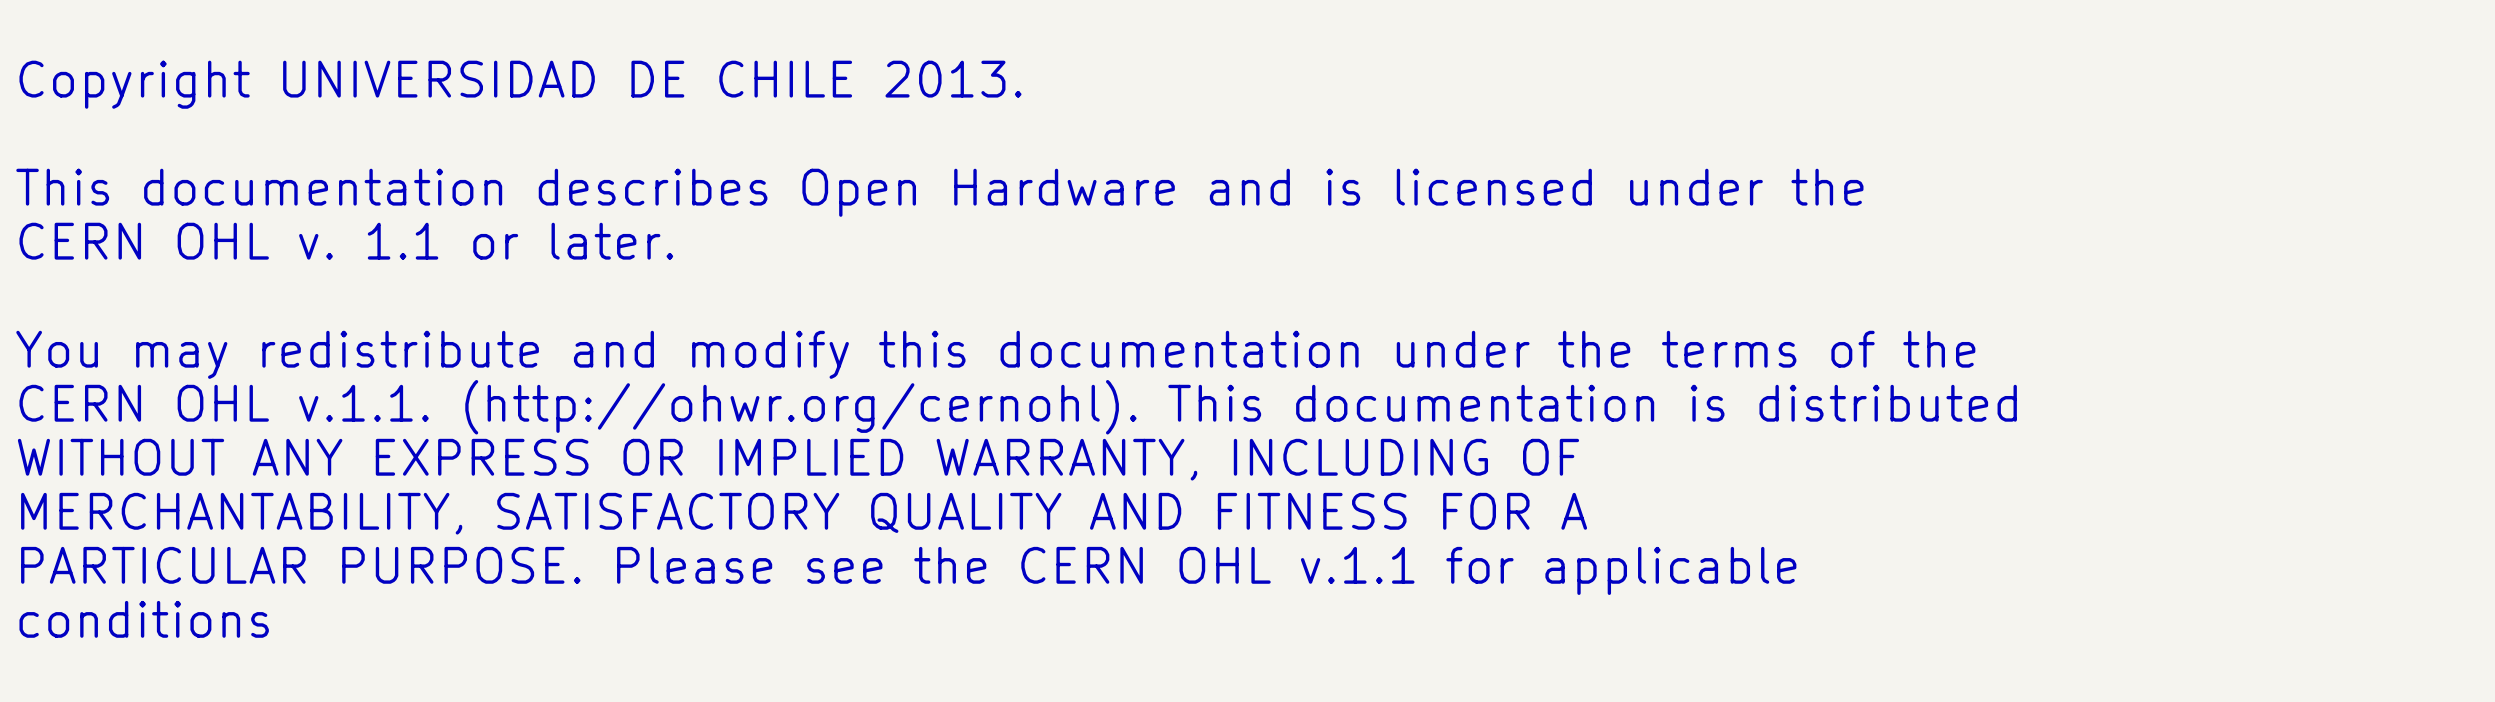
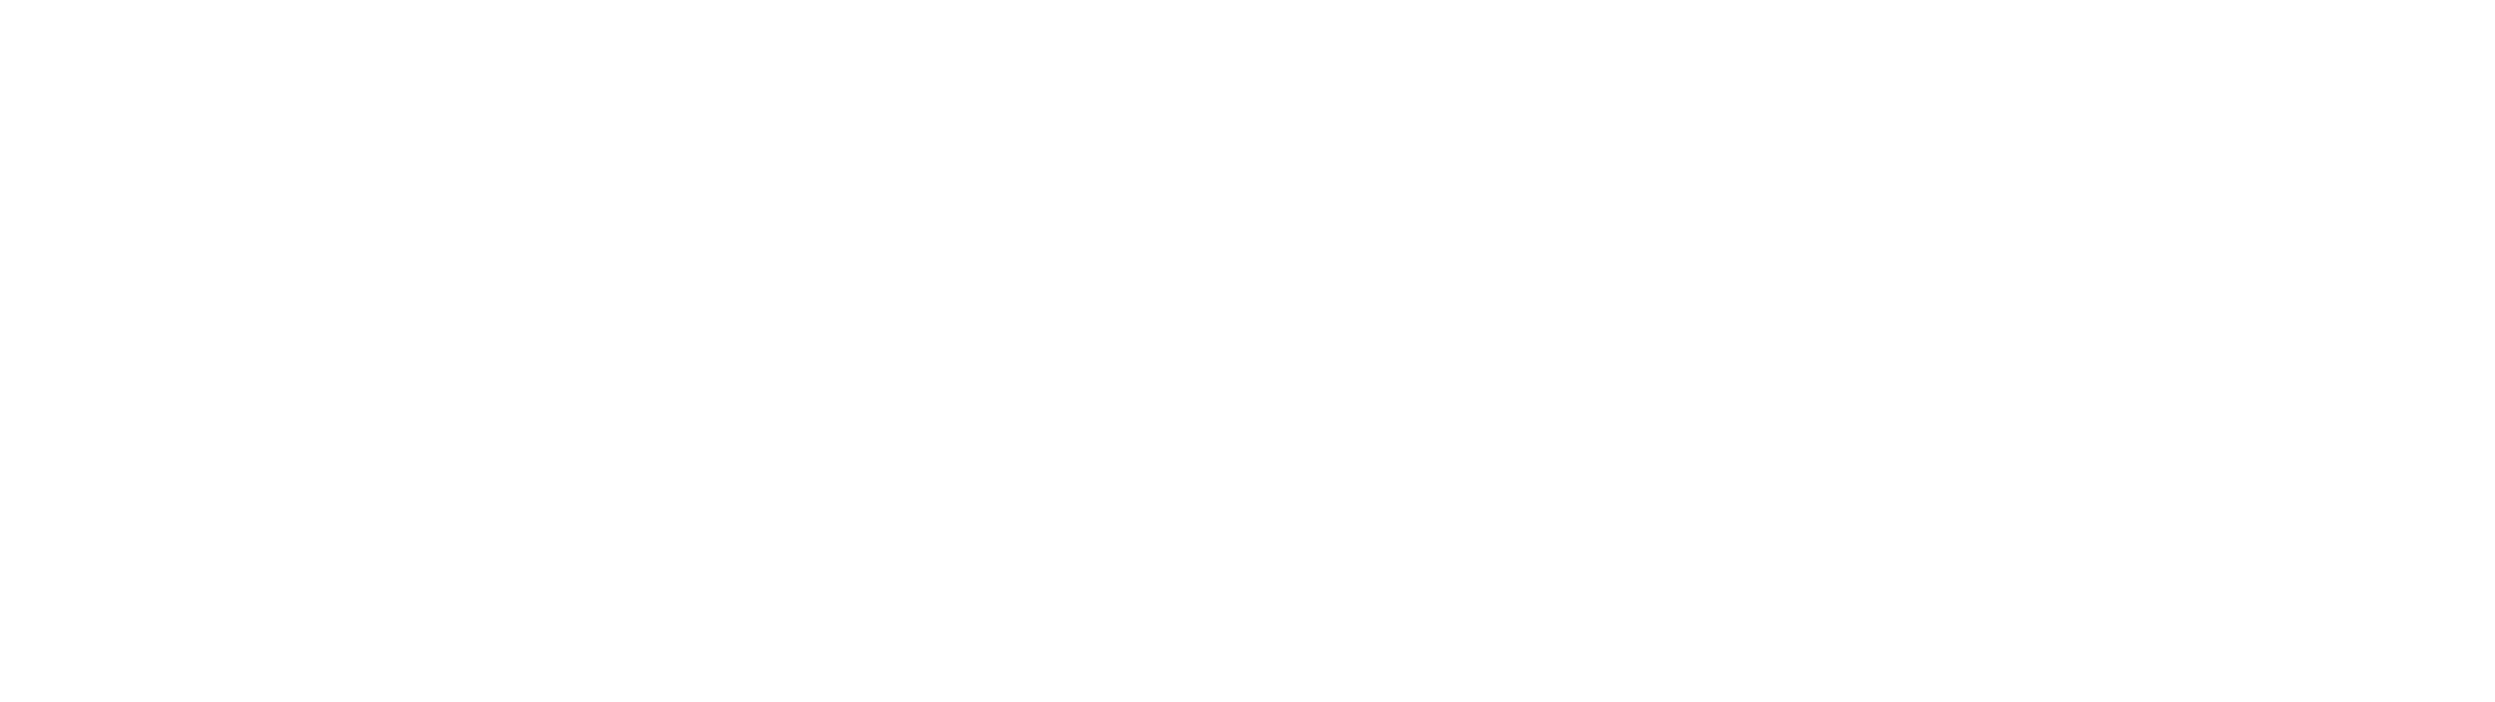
text: Copyright UNIVERSIDAD DE CHILE 2013. (520, 84) -> none
text: This documentation describes Open Hardware and is licensed under the (939, 192) -> none
text: CERN OHL v. 1.1 or later. (346, 241) -> none
text: You may redistribute and modify this documentation under the terms of the (995, 354) -> none
text: CERN OHL v.1.1. (http://ohwr.org/cernohl). This documentation is distributed (1018, 407) -> none
text: WITHOUT ANY EXPRESS OR IMPLIED WARRANTY, INCLUDING OF (798, 459) -> none
text: MERCHANTABILITY, SATISFACTORY QUALITY AND FITNESS FOR A (804, 513) -> none
text: PARTICULAR PURPOSE. Please see the CERN OHL v.1.1 for applicable (908, 570) -> none
text: conditions (144, 619) -> none

